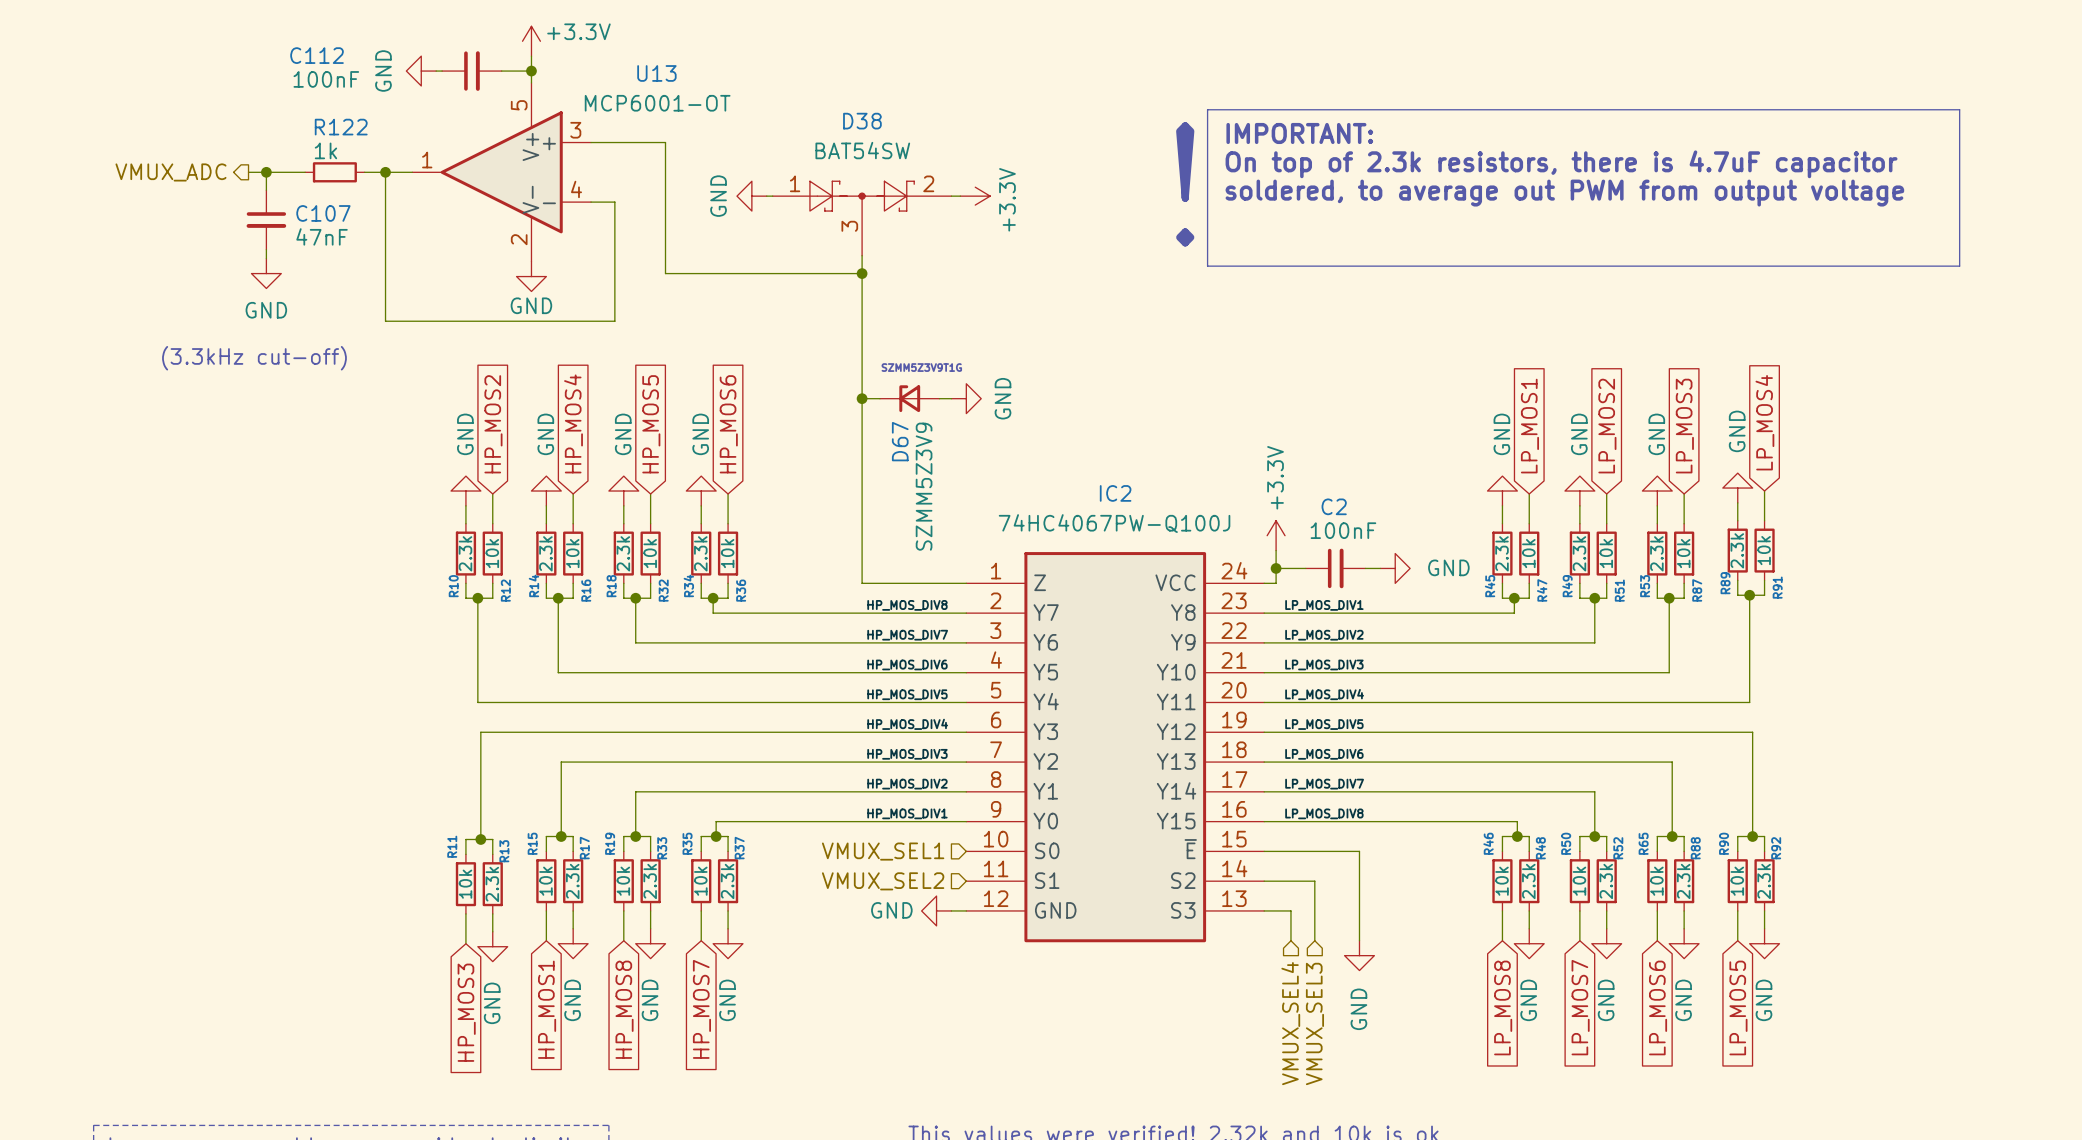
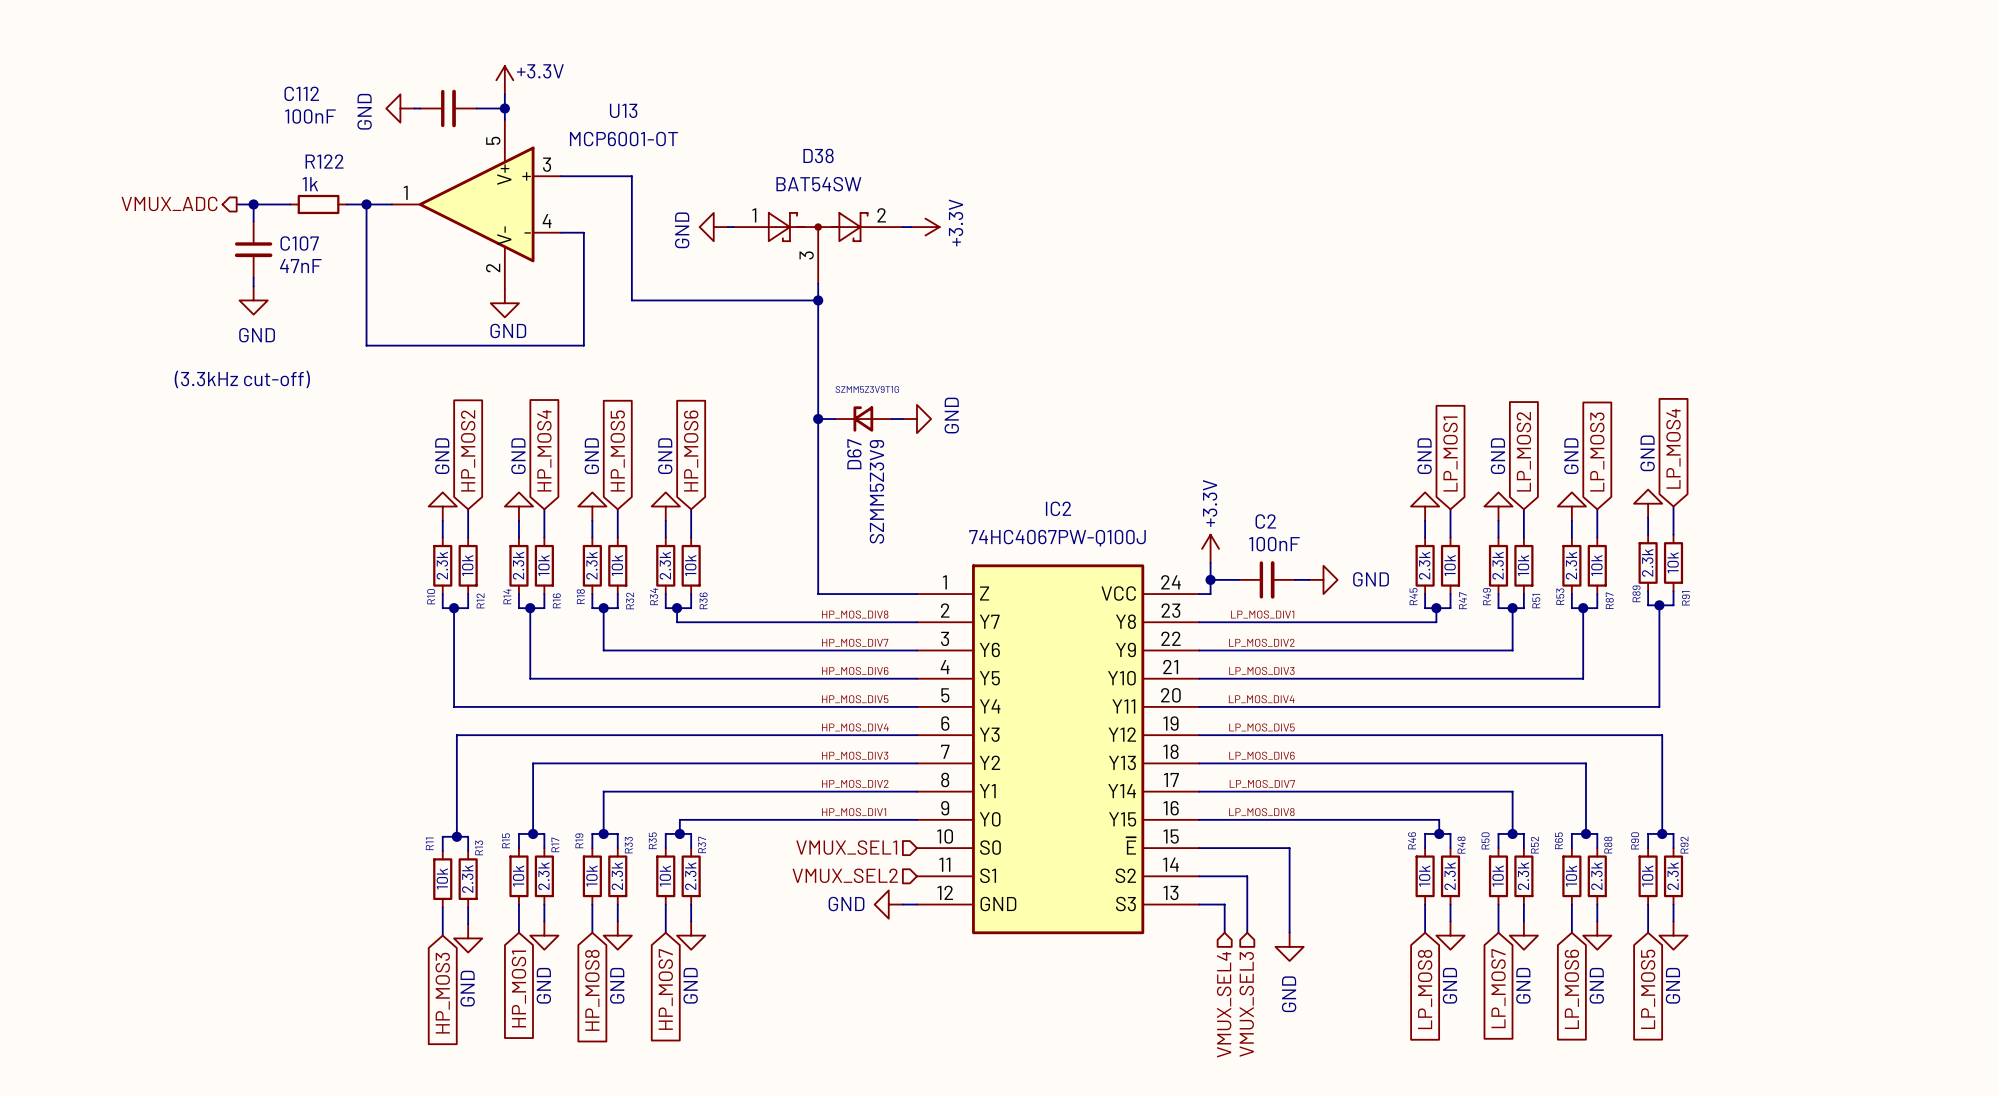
line: (1207, 109) (1959, 109) (1959, 266) (1207, 266) (1207, 109) -> none
text: IMPORTANT: (1299, 133) -> none
text: On top of 2.3k resistors, there is 4.7uF capacitor (1561, 164) -> none
text: ! (1185, 184) -> none
text: soldered, to average out PWM from output voltage (1564, 193) -> none

